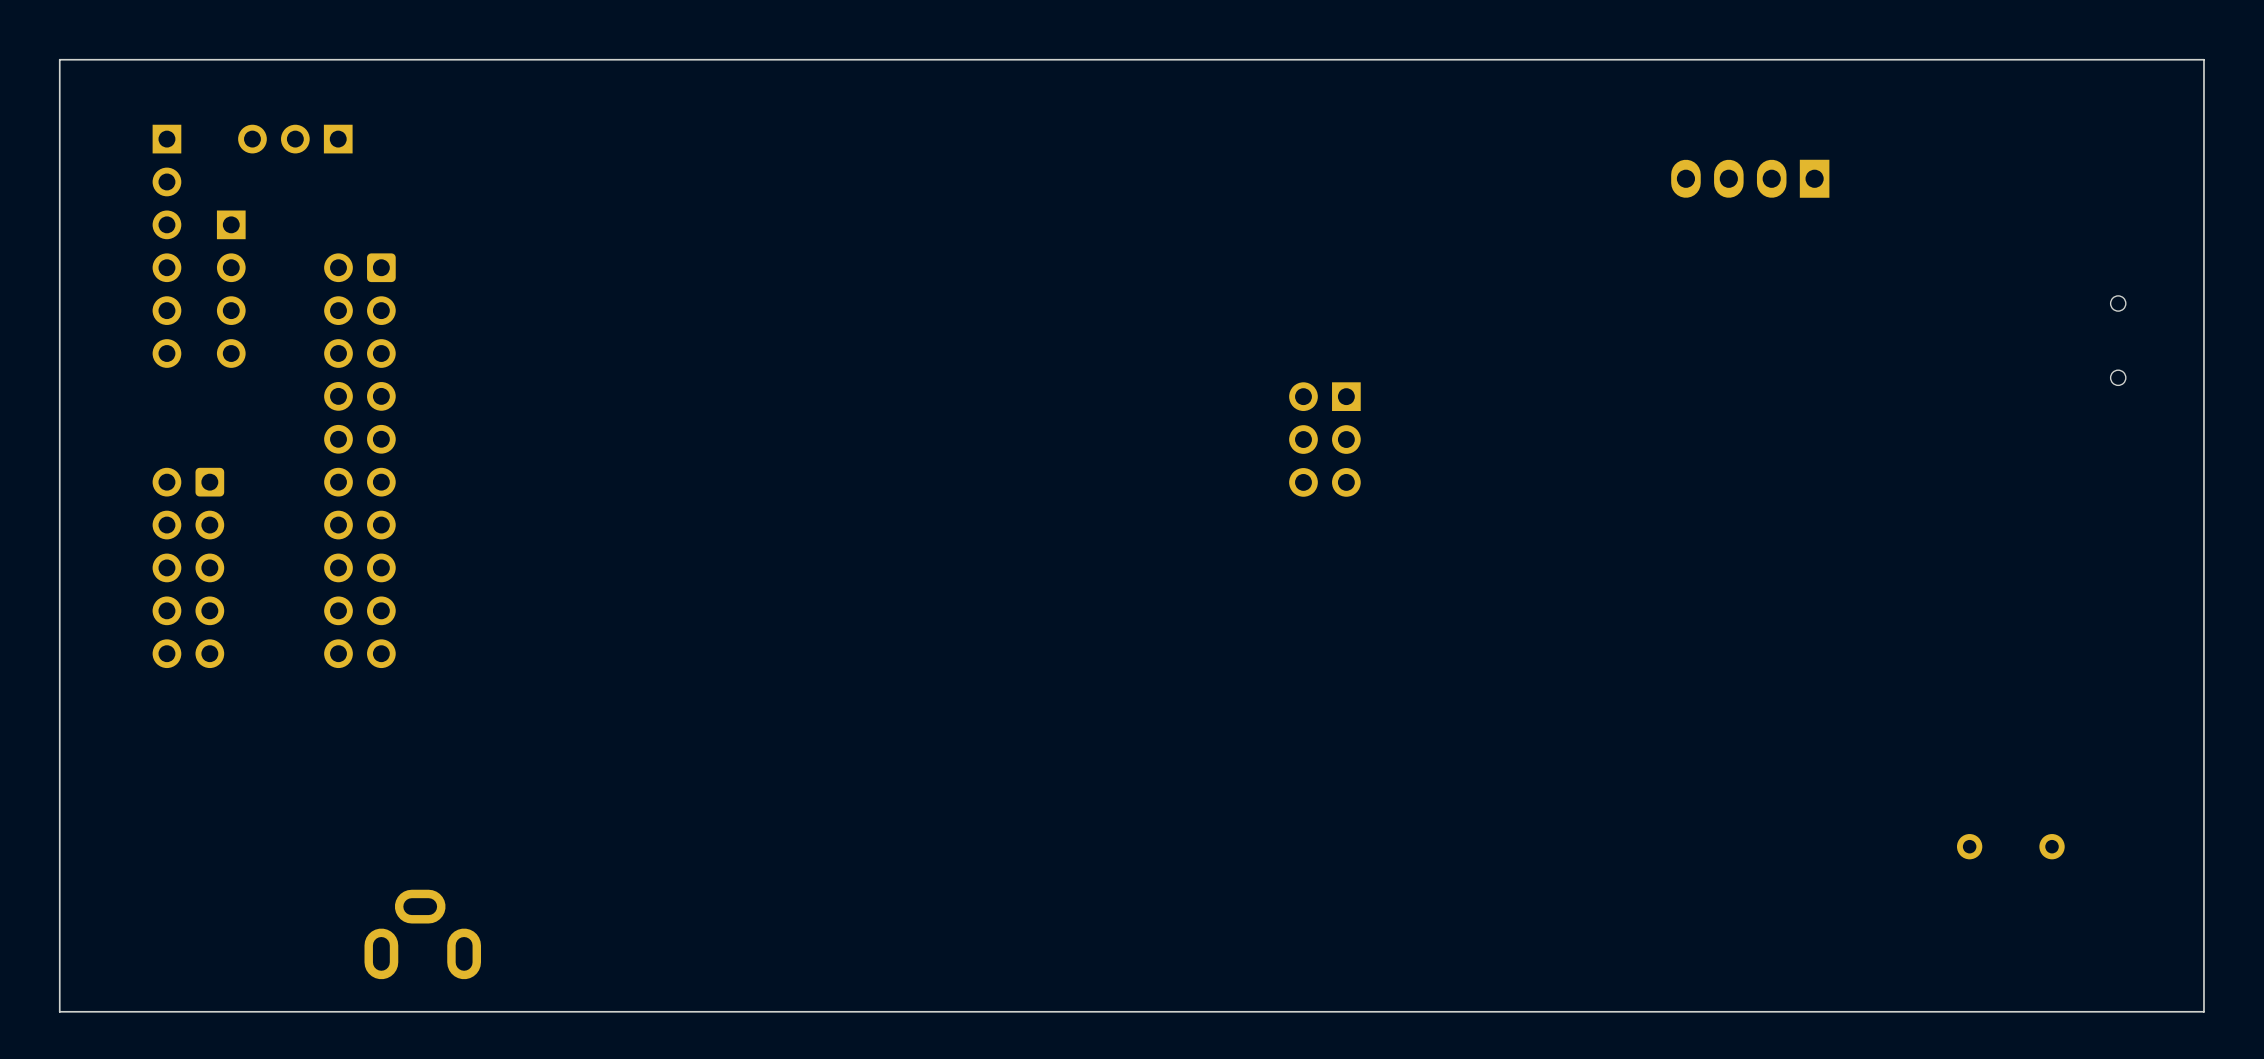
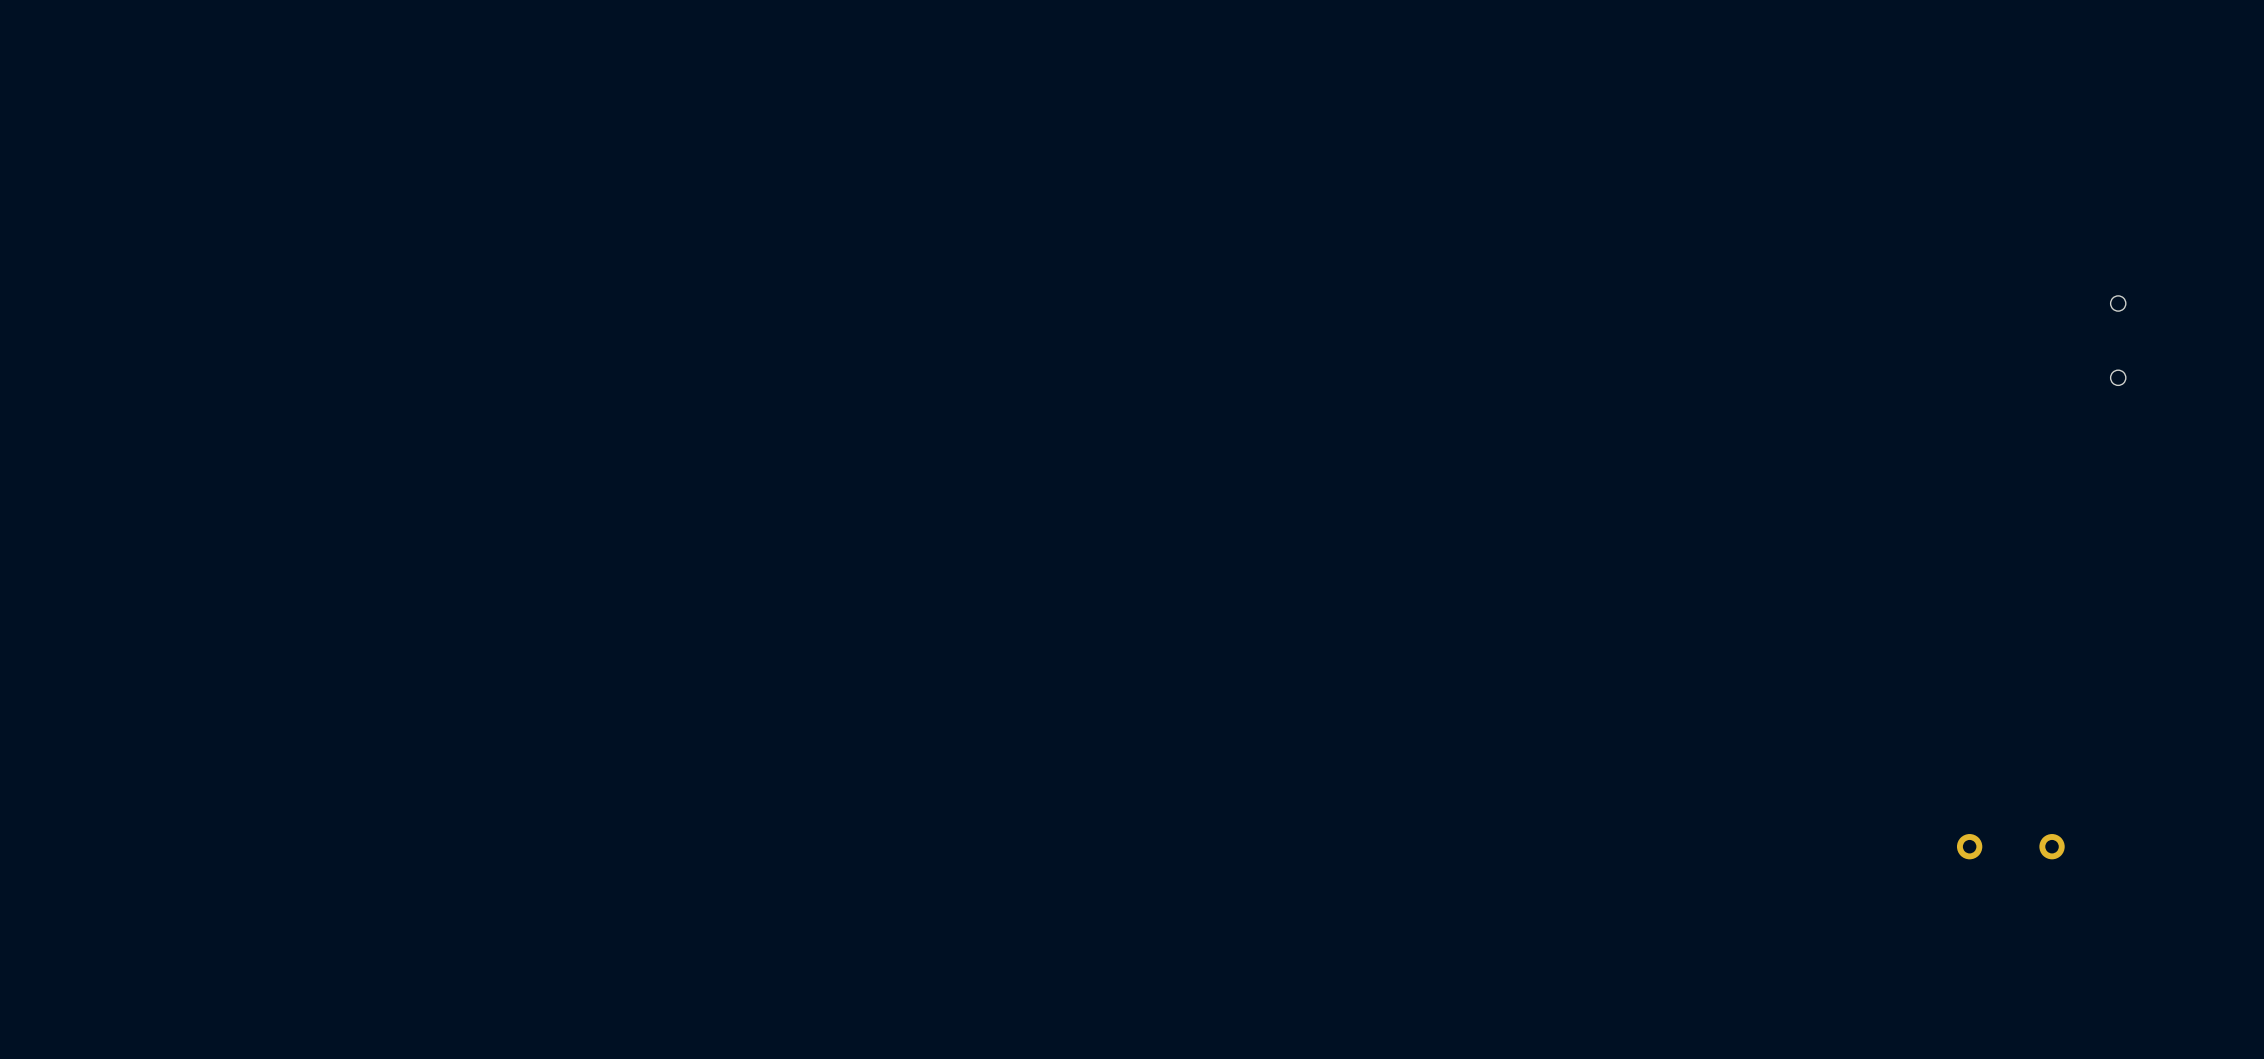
board edge: (2203, 59) (59, 59) (59, 1011) (2203, 1011) (2203, 59) -> none
part: (295, 139) -> none
part: (1750, 178) -> none
part: (166, 246) -> none
part: (231, 289) -> none
part: (1324, 439) -> none
part: (359, 460) -> none
part: (188, 567) -> none
part: (422, 934) -> none

